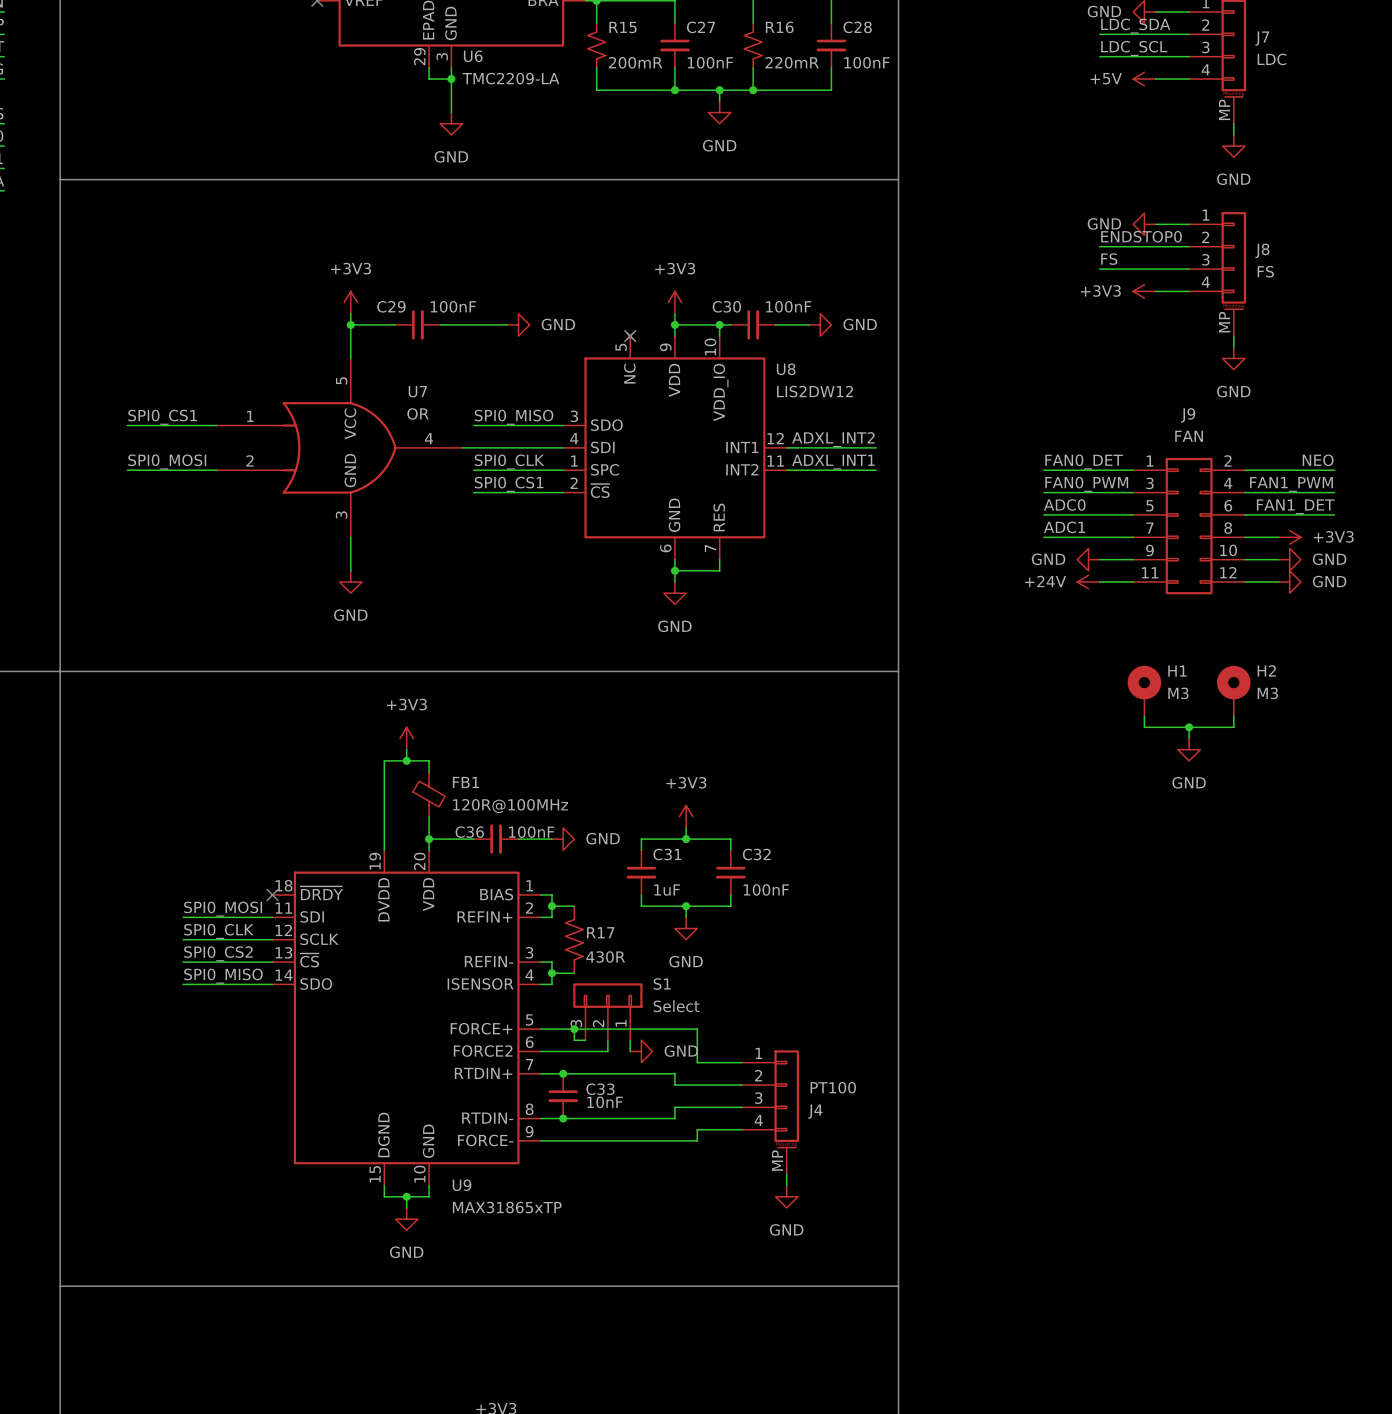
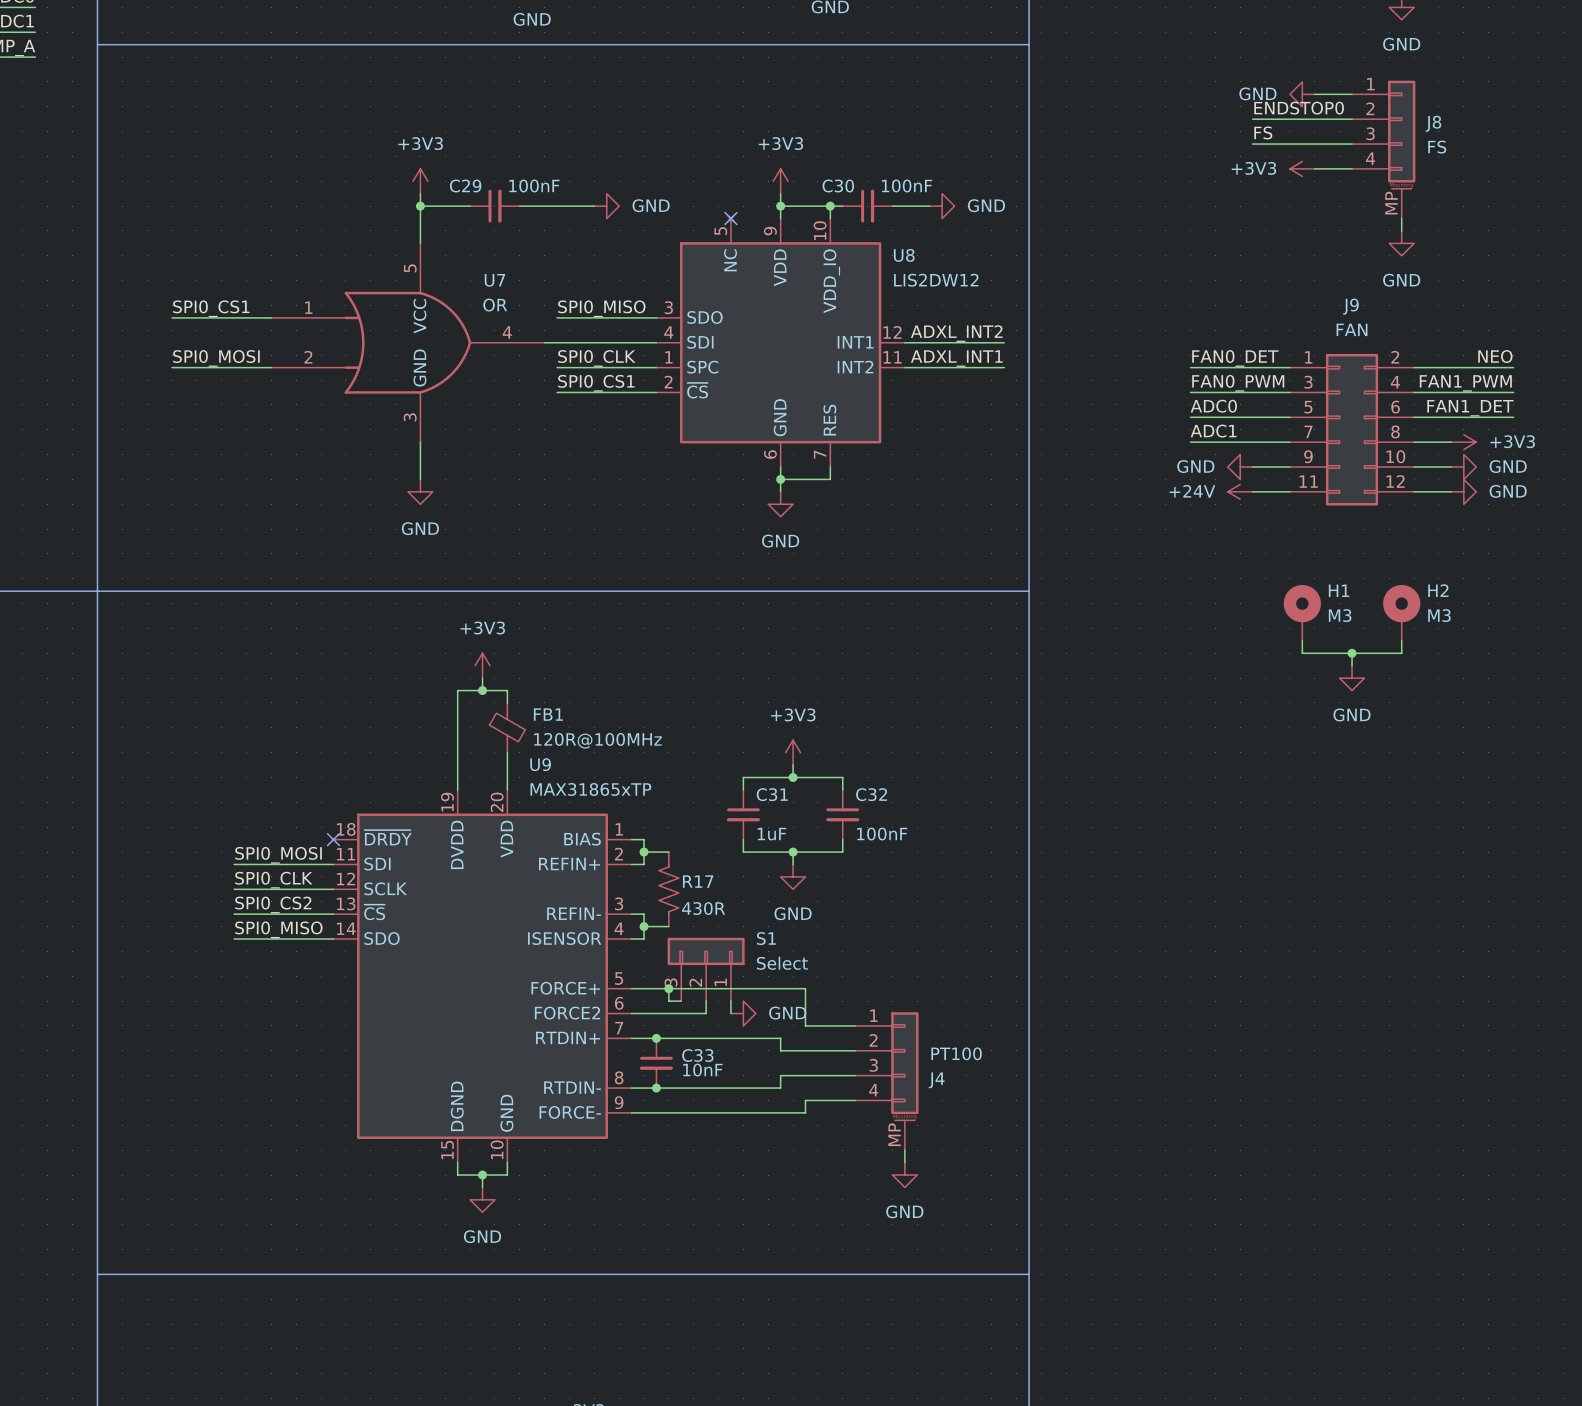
wire: (429, 839) (473, 839) -> none
junction: (429, 839) -> none
C36: 100nF (496, 839) -> none
wire: (518, 839) (551, 839) -> none
power symbol: GND (563, 839) -> none
U9 name position: U9 (462, 1185) -> U9 (540, 764)
U9 value position: MAX31865xTP (507, 1207) -> MAX31865xTP (590, 789)

